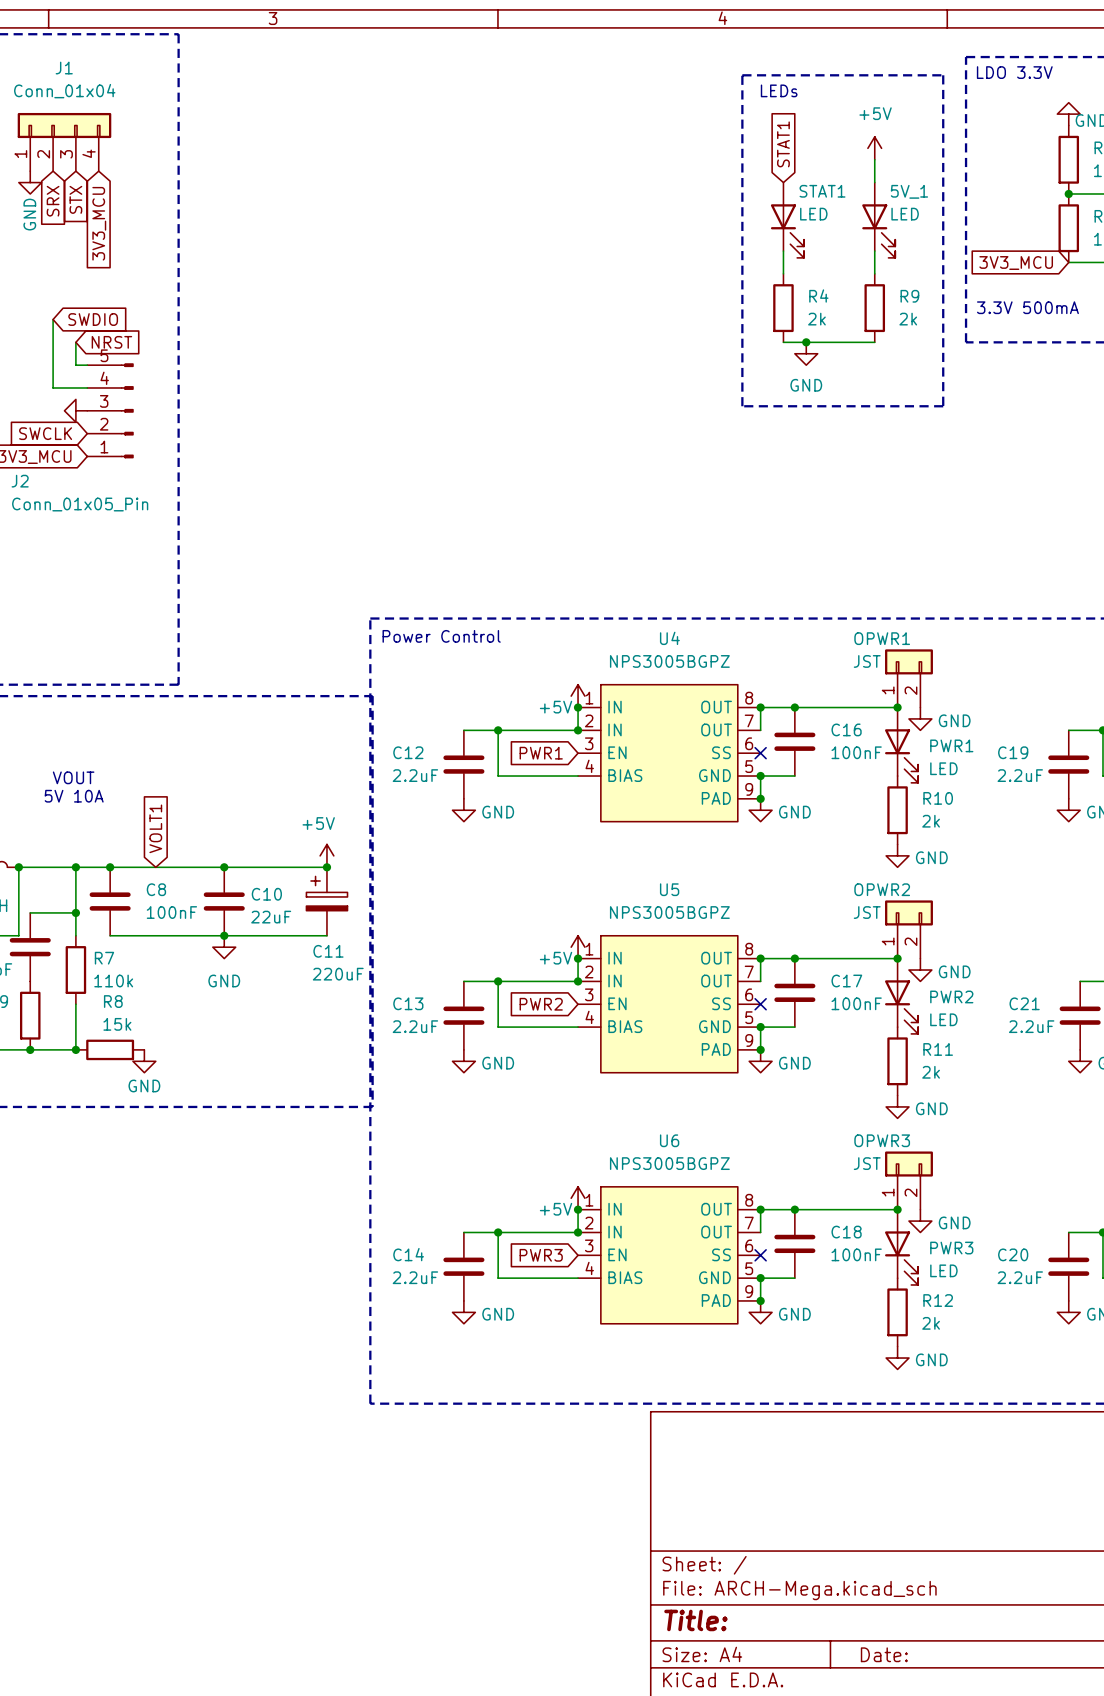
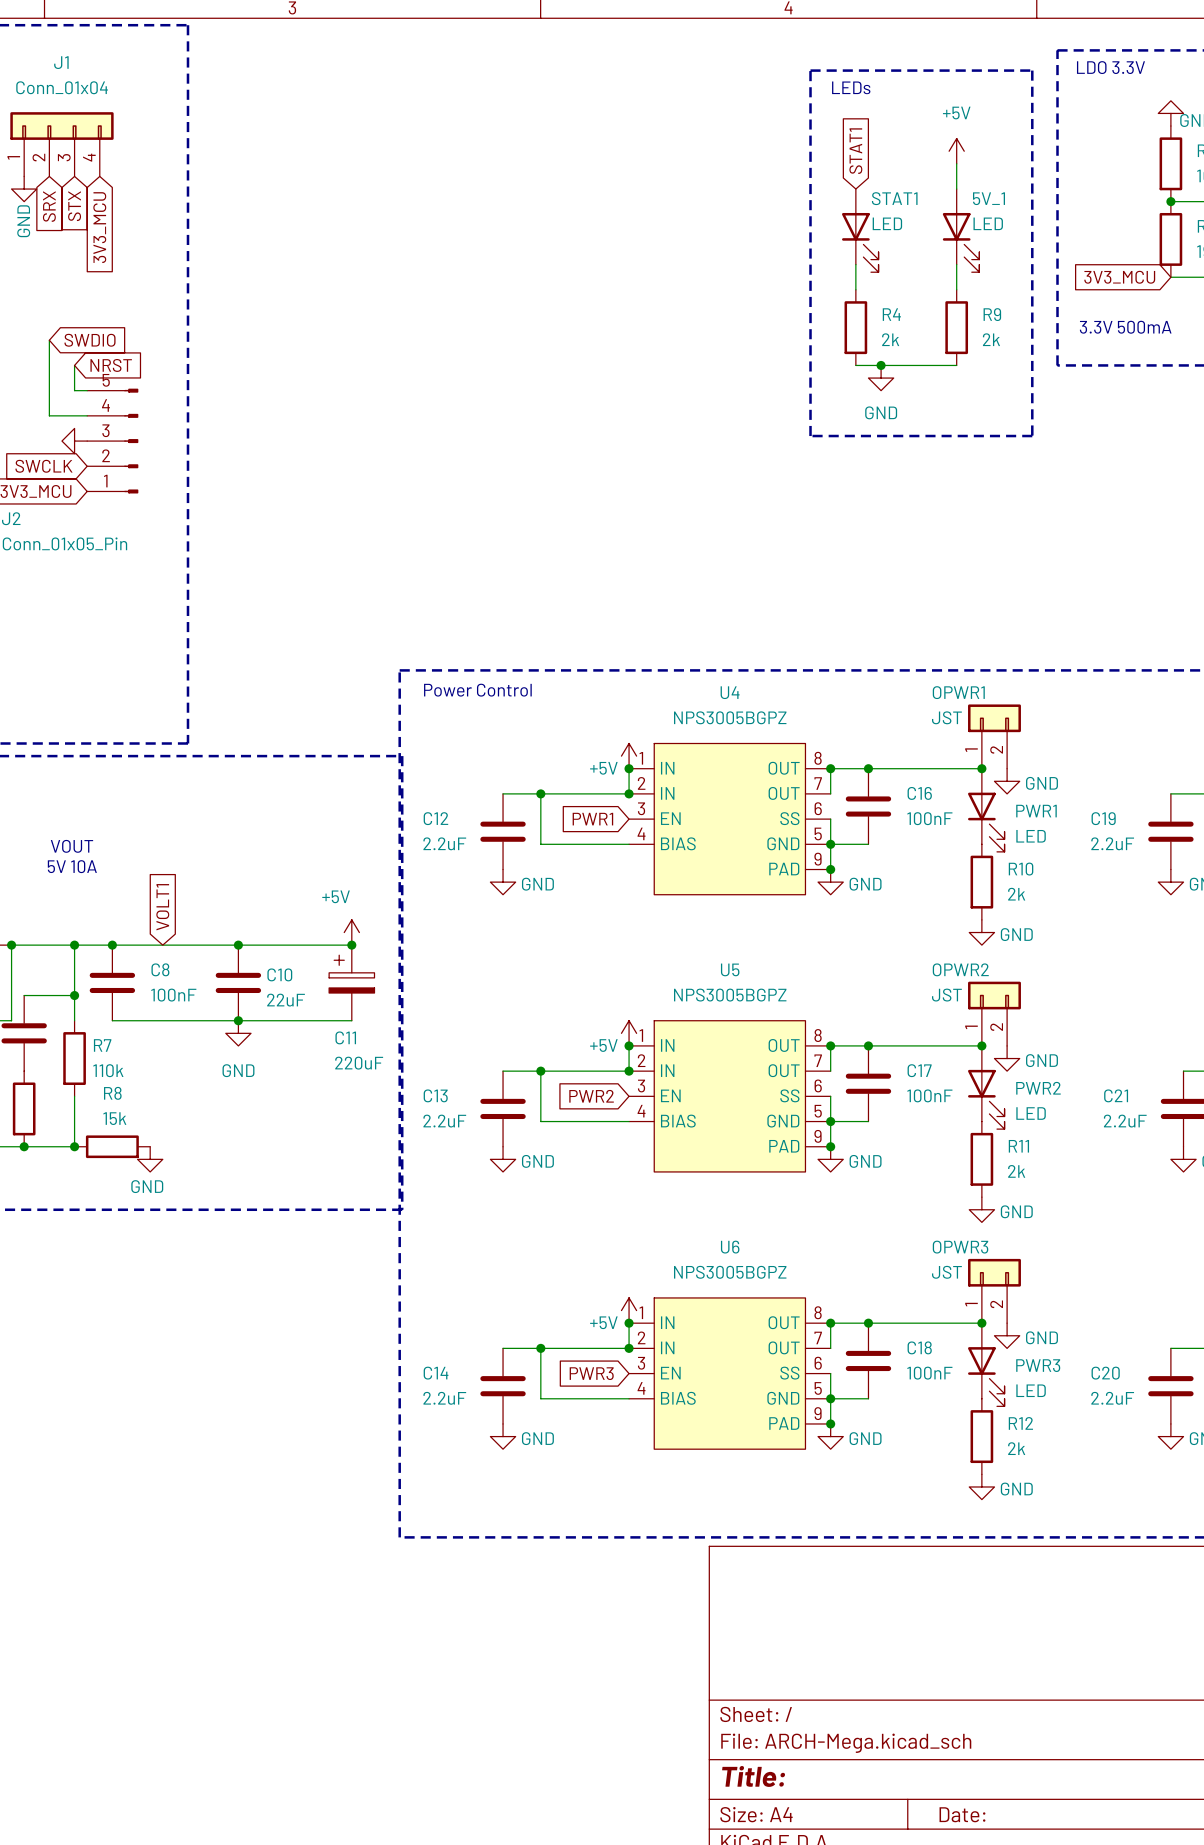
wire: none -> (830, 819) (830, 844)
no-connect mark: (760, 753) -> none
wire: none -> (830, 1096) (830, 1121)
no-connect mark: (760, 1004) -> none
wire: none -> (830, 1373) (830, 1398)
no-connect mark: (760, 1255) -> none

